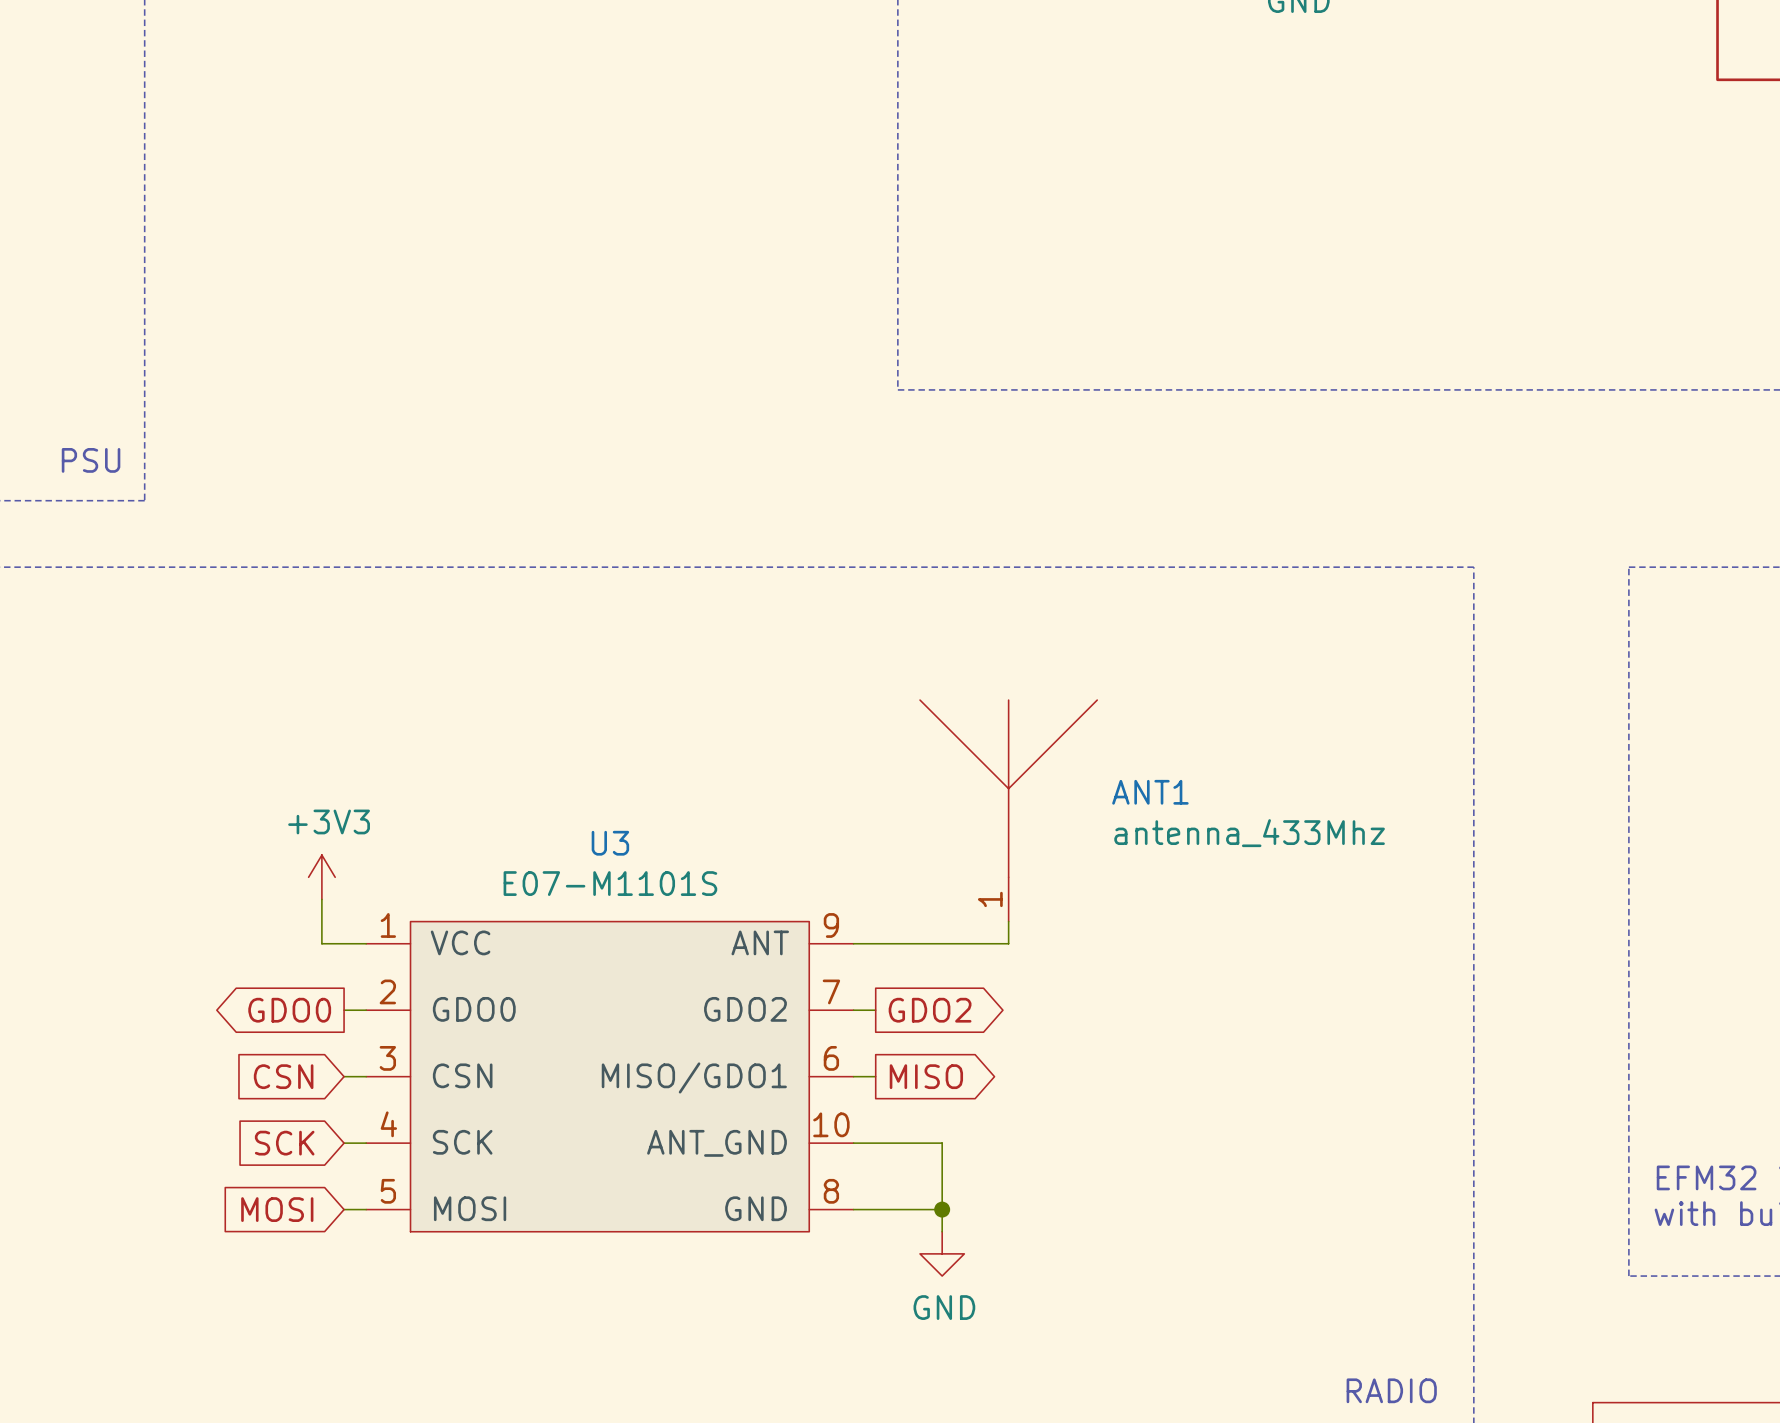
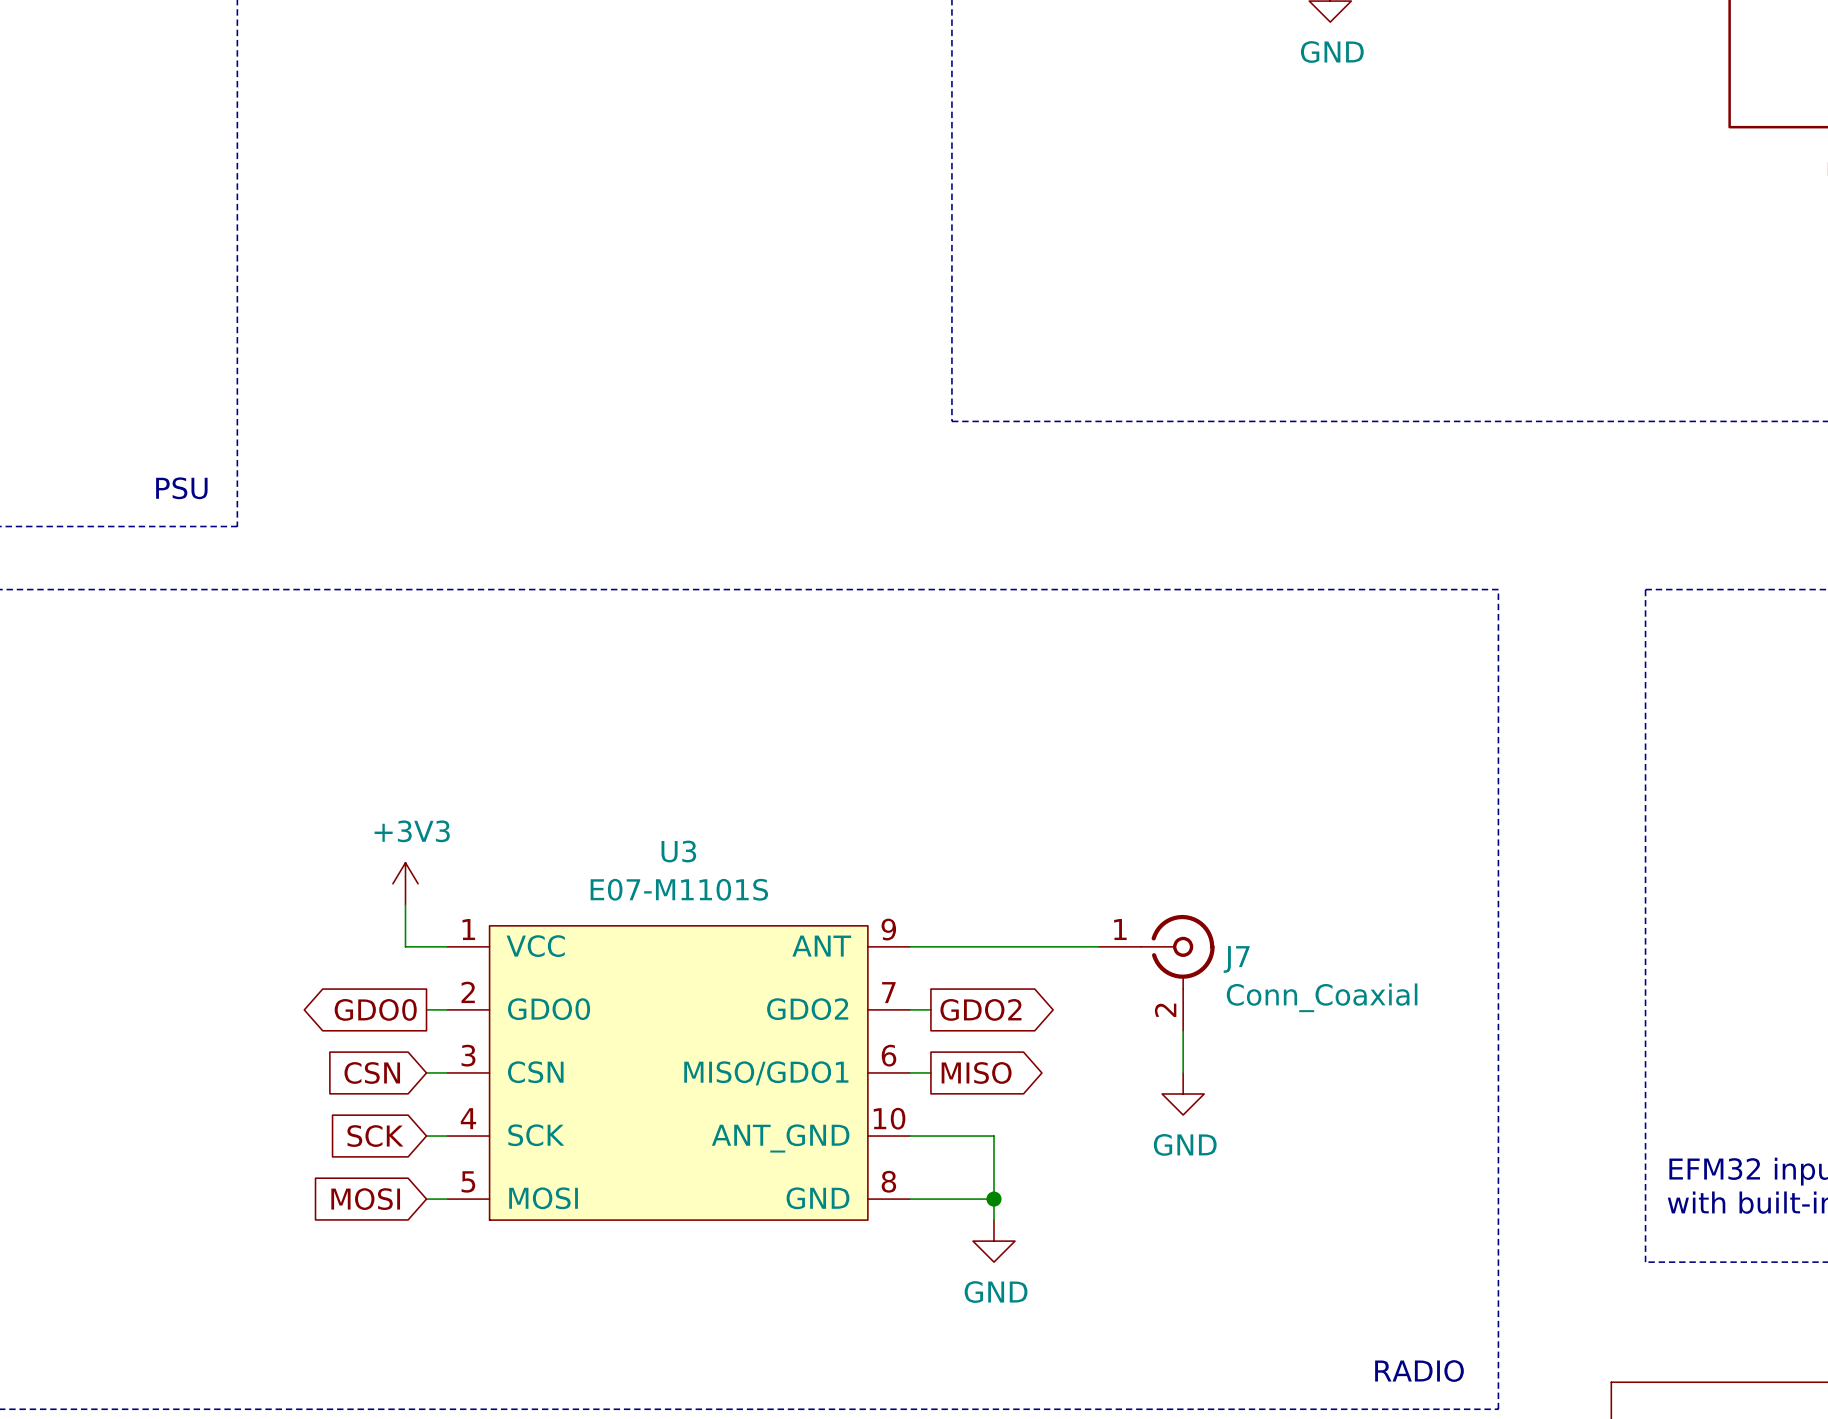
ANT1: antenna_433Mhz (1008, 810) -> none
wire: (1008, 921) (1008, 943) -> (1099, 946) (1057, 946)
J7: none -> Conn_Coaxial (1156, 972)
wire: none -> (1183, 1030) (1183, 1072)
power symbol: none -> GND (1183, 1093)

